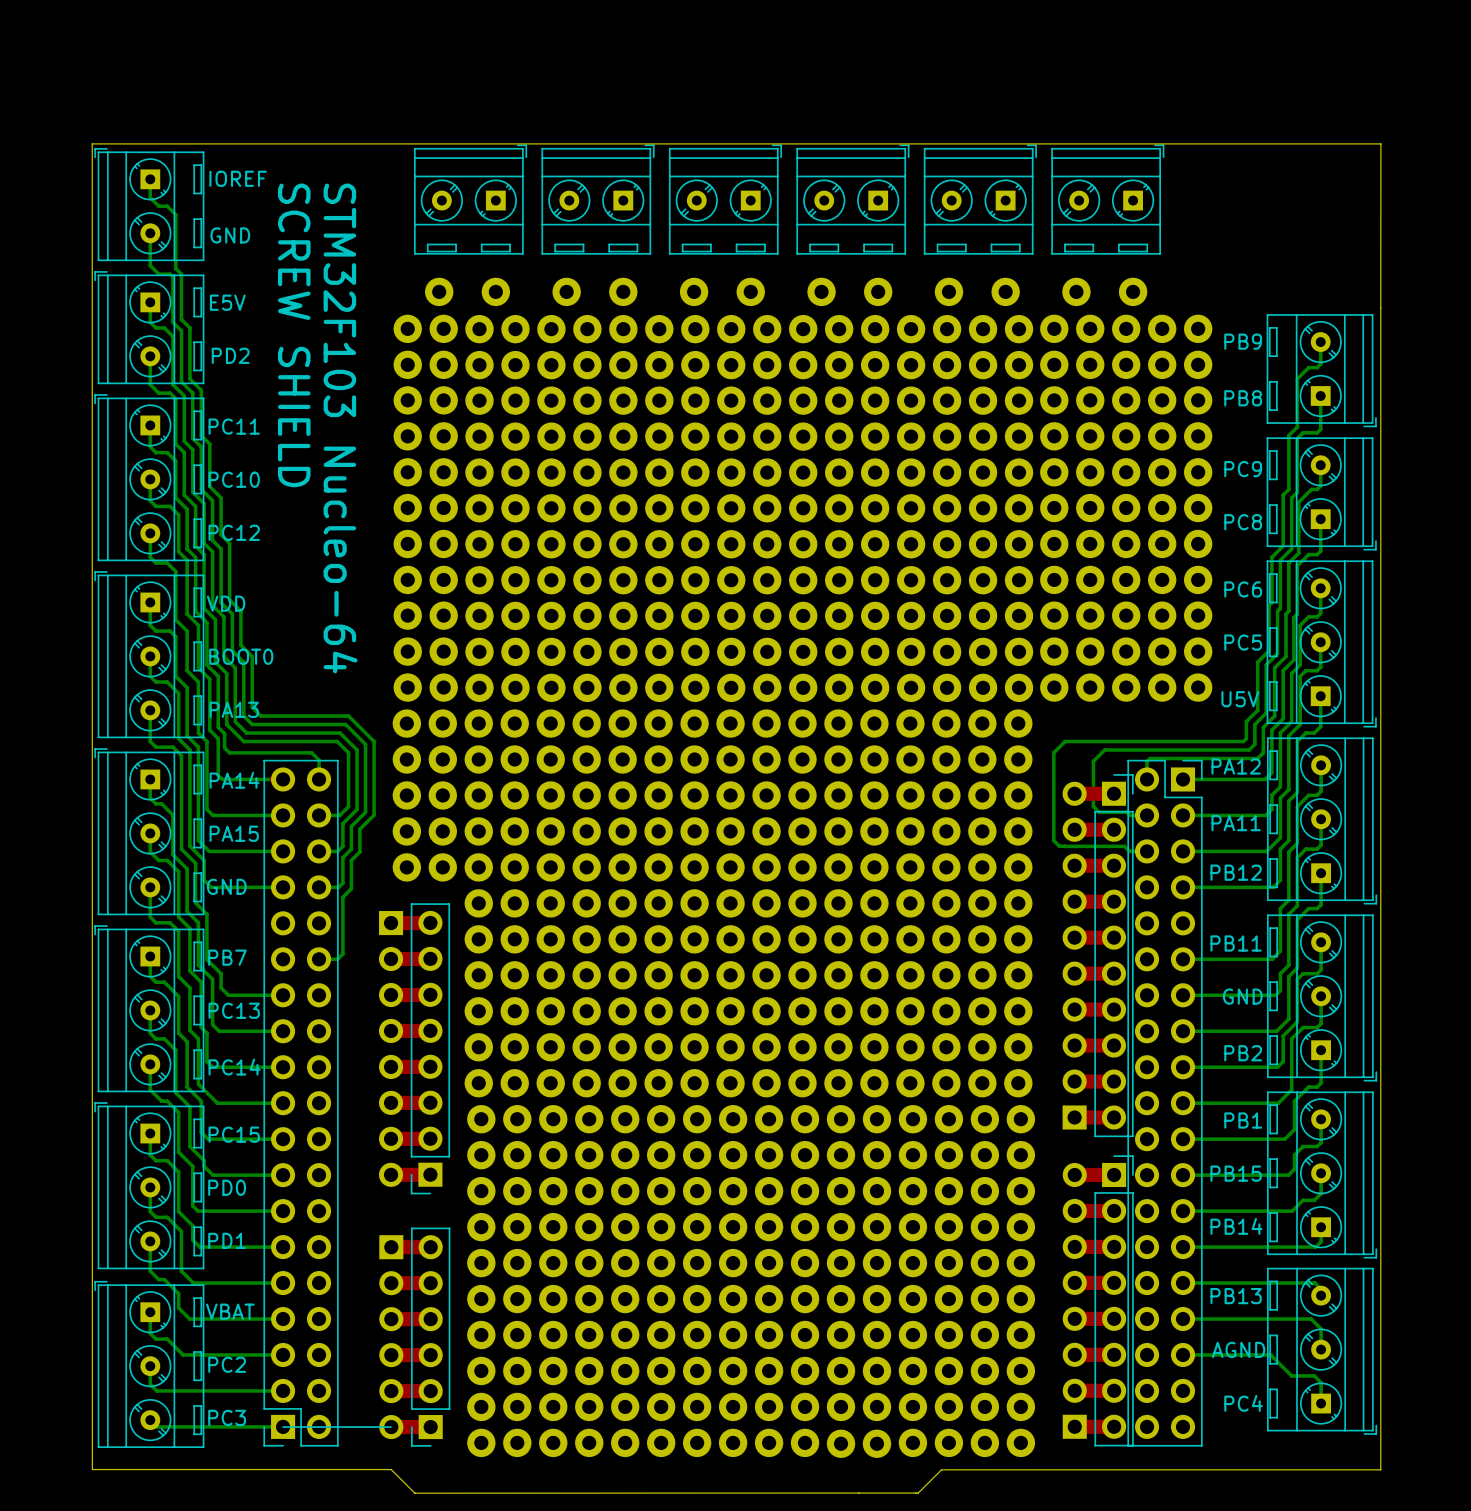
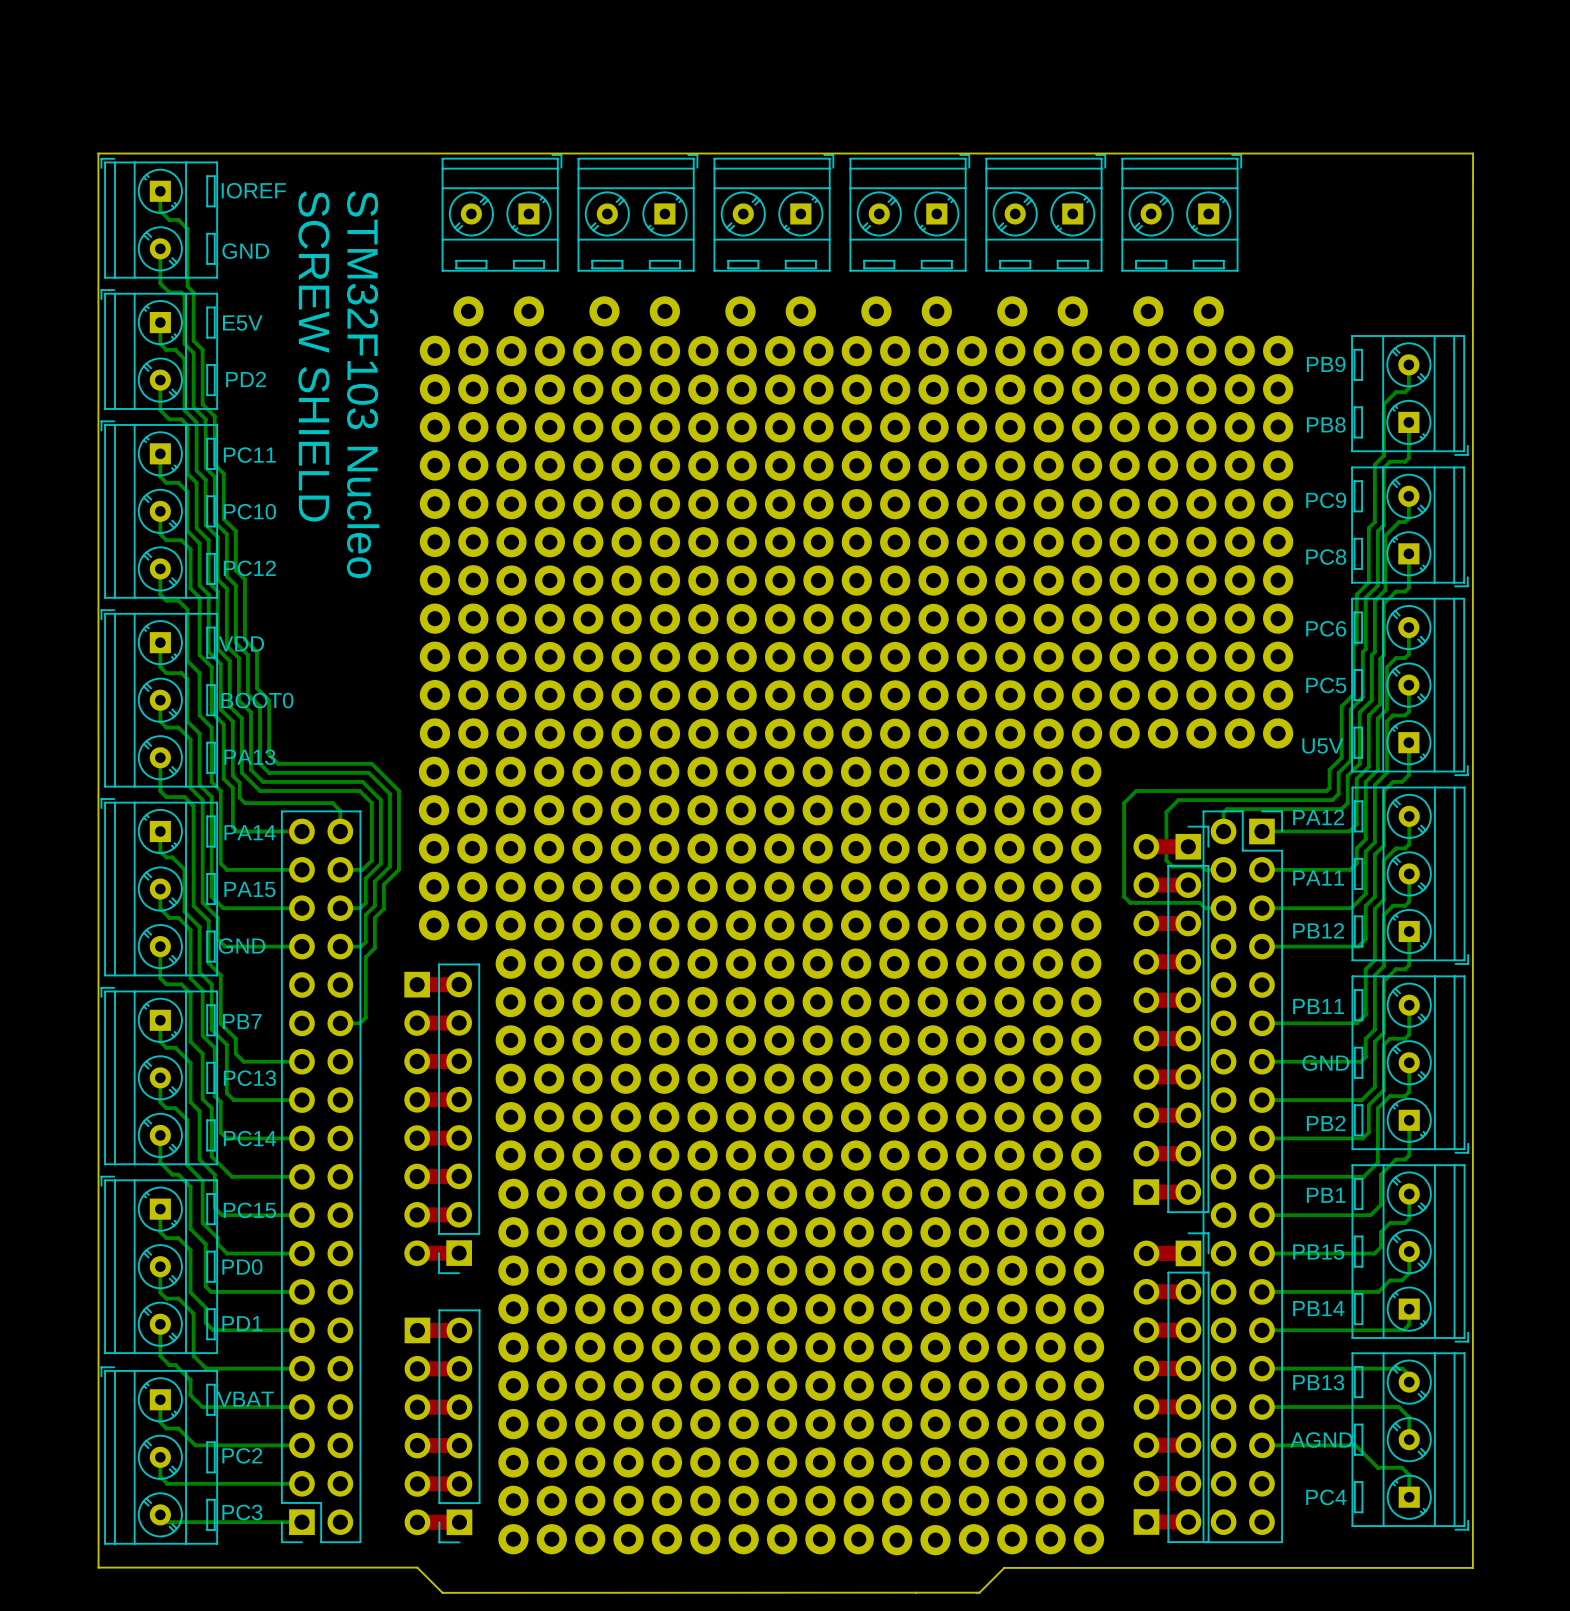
text: STM32F103 Nucleo-64 (340, 428) -> STM32F103 Nucleo (363, 384)
line: (283, 1427) (390, 1427) -> none

